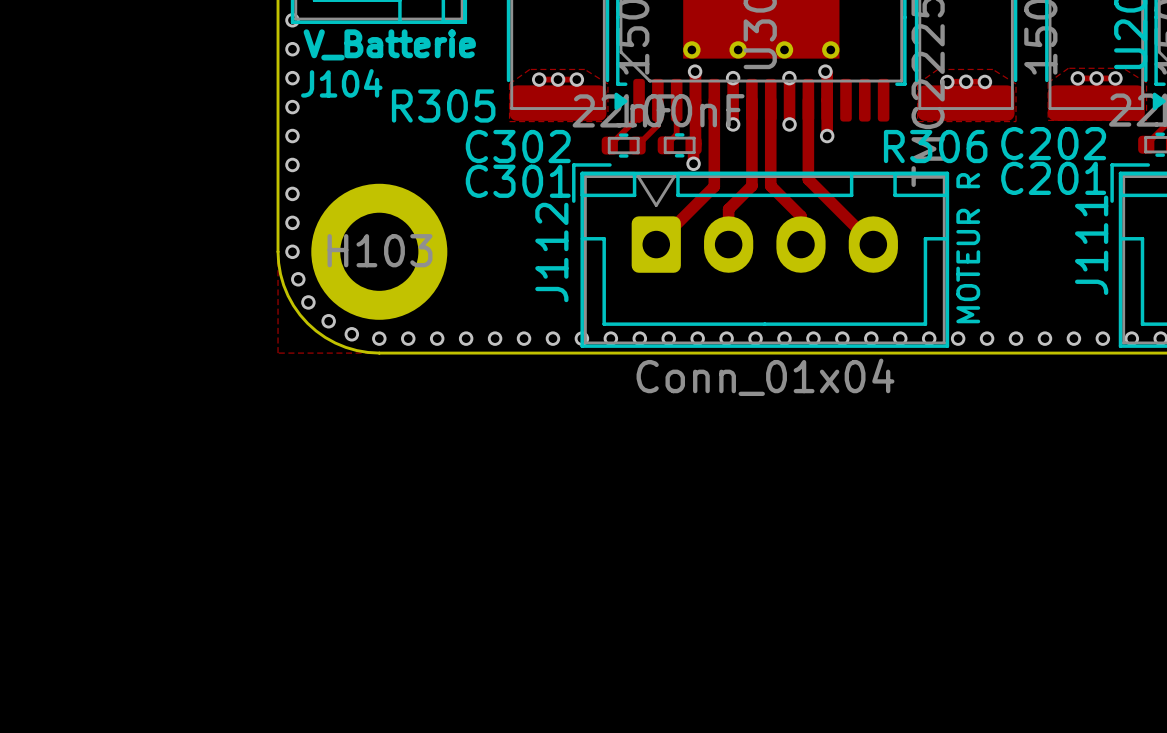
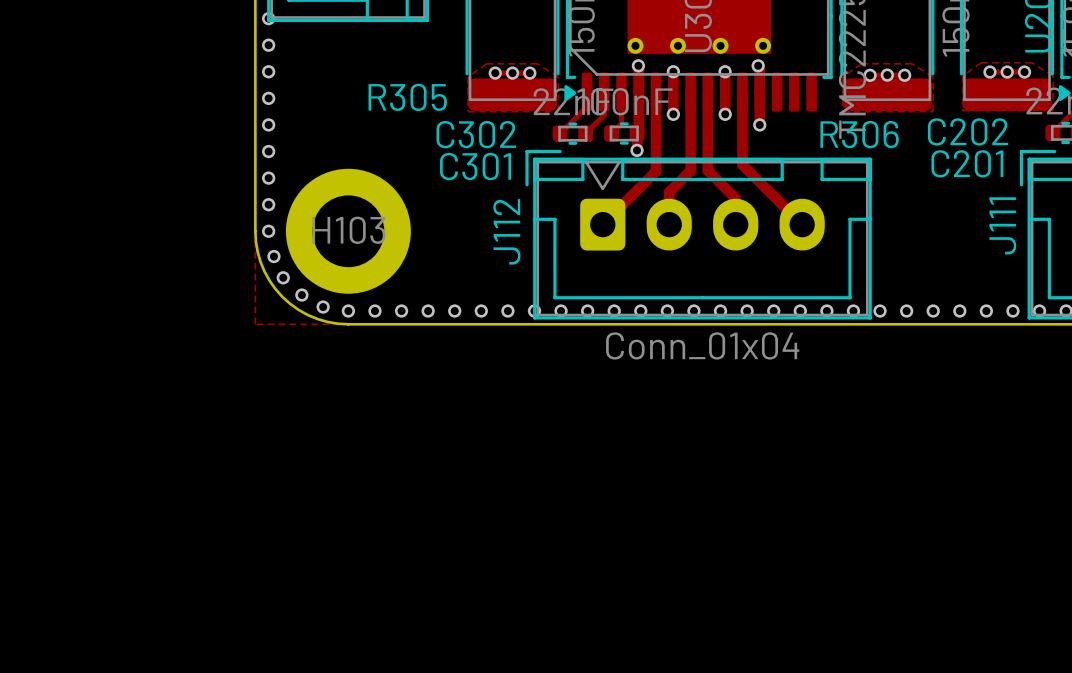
text: V_Batterie (389, 44) -> none
text: J104 (341, 83) -> none
text: MOTEUR R (968, 248) -> none

